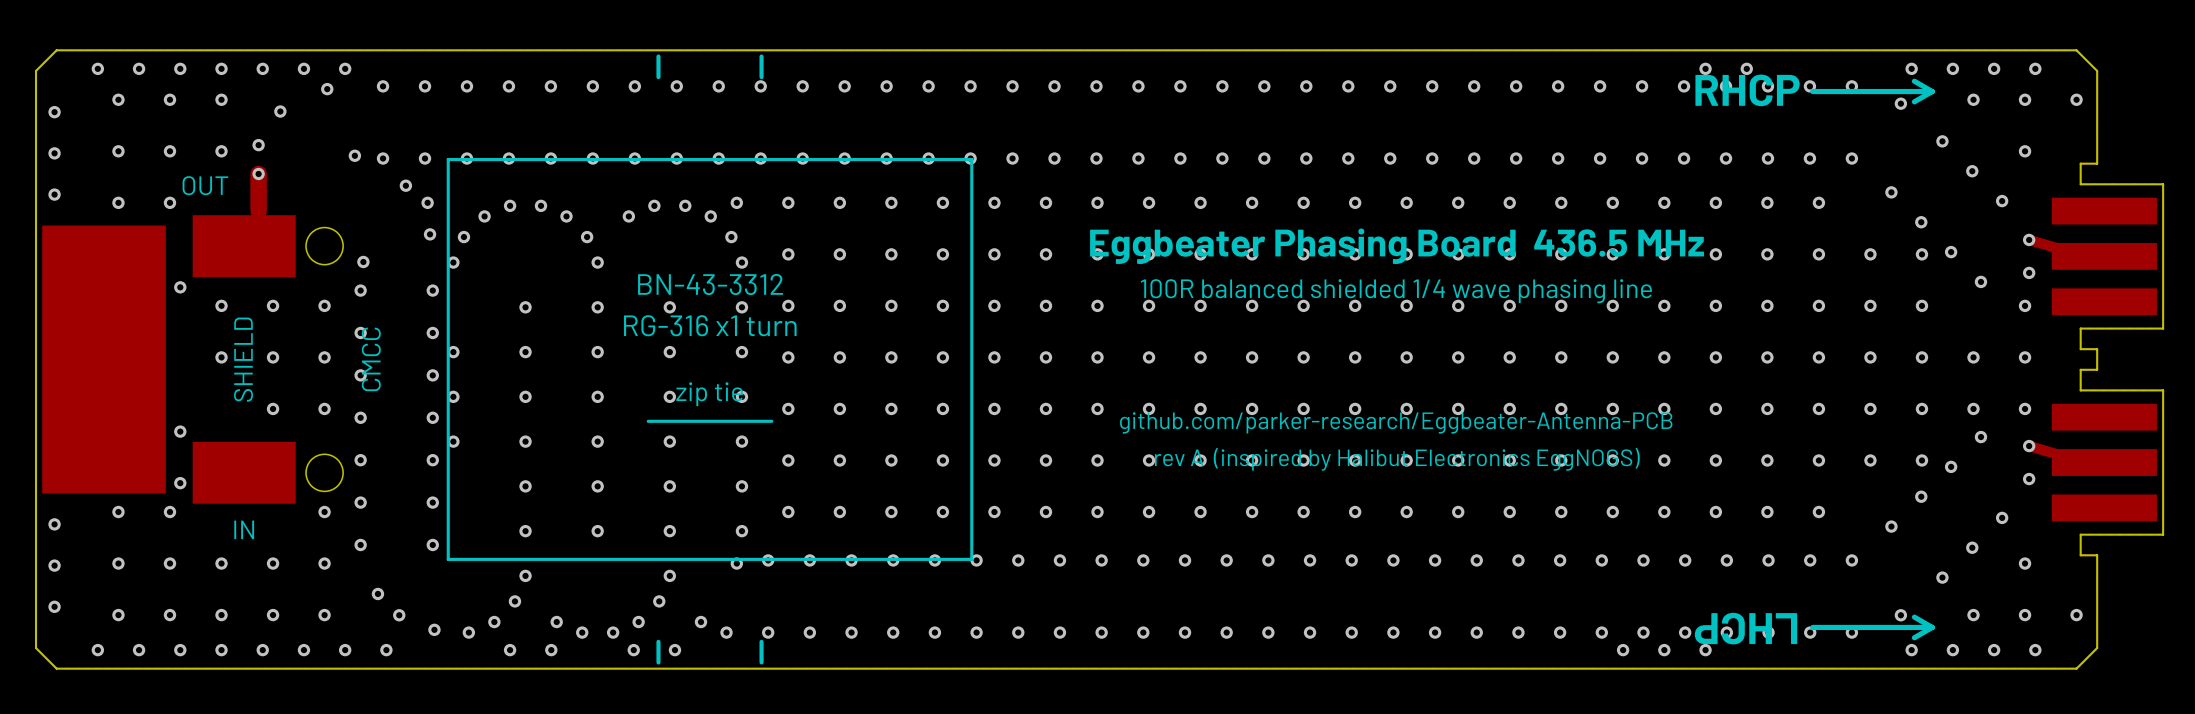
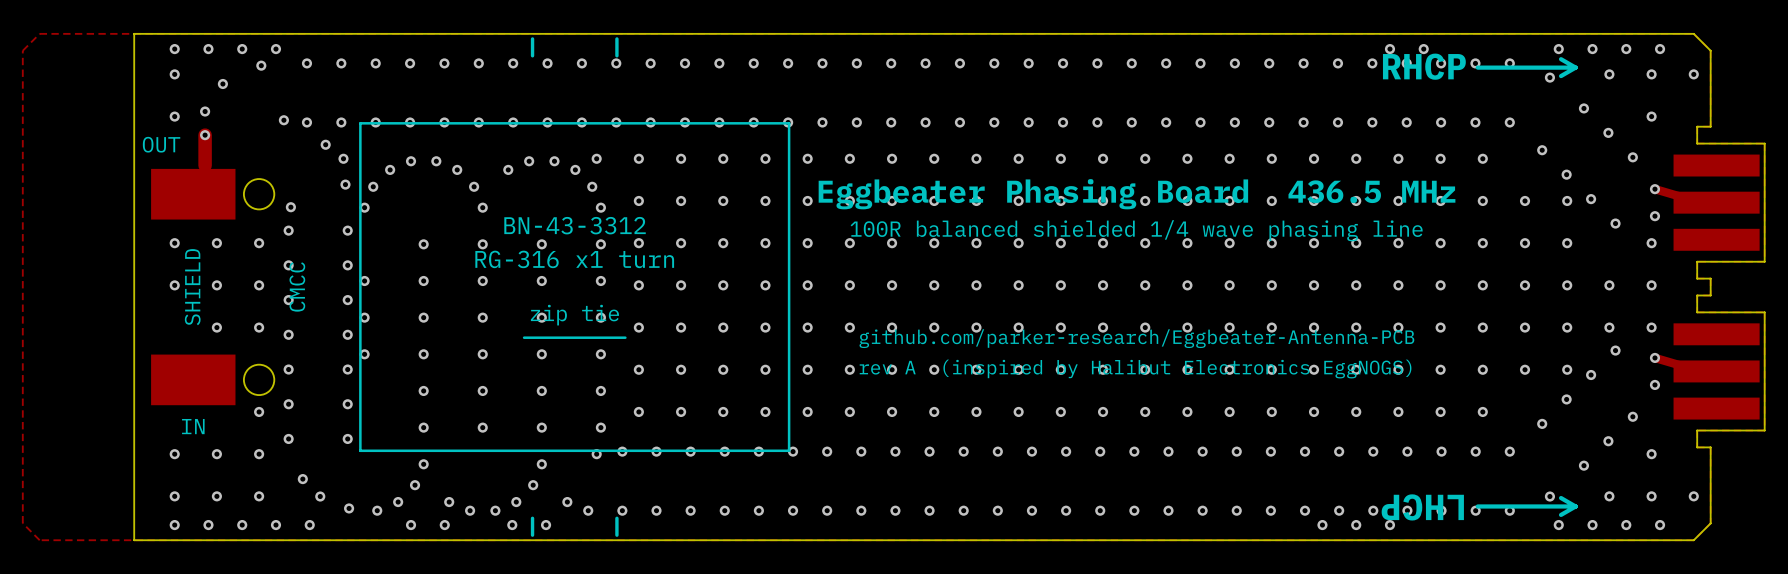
board edge: (172, 50) (56, 50) (36, 70) (36, 648) (56, 668) (172, 668) -> (134, 33) (134, 540)
via: (97, 68) -> none
via: (139, 68) -> none
via: (180, 68) -> none
via: (118, 99) -> none
via: (169, 99) -> none
via: (54, 112) -> none
via: (118, 151) -> none
via: (169, 151) -> none
via: (54, 153) -> none
via: (54, 194) -> none
via: (118, 202) -> none
via: (169, 202) -> none
via: (180, 287) -> none
part: (104, 359) -> none
via: (180, 431) -> none
via: (180, 483) -> none
via: (118, 512) -> none
via: (169, 512) -> none
via: (54, 524) -> none
via: (118, 563) -> none
via: (169, 563) -> none
via: (54, 565) -> none
via: (54, 606) -> none
via: (118, 615) -> none
via: (169, 615) -> none
via: (97, 650) -> none
via: (139, 650) -> none
via: (180, 650) -> none

